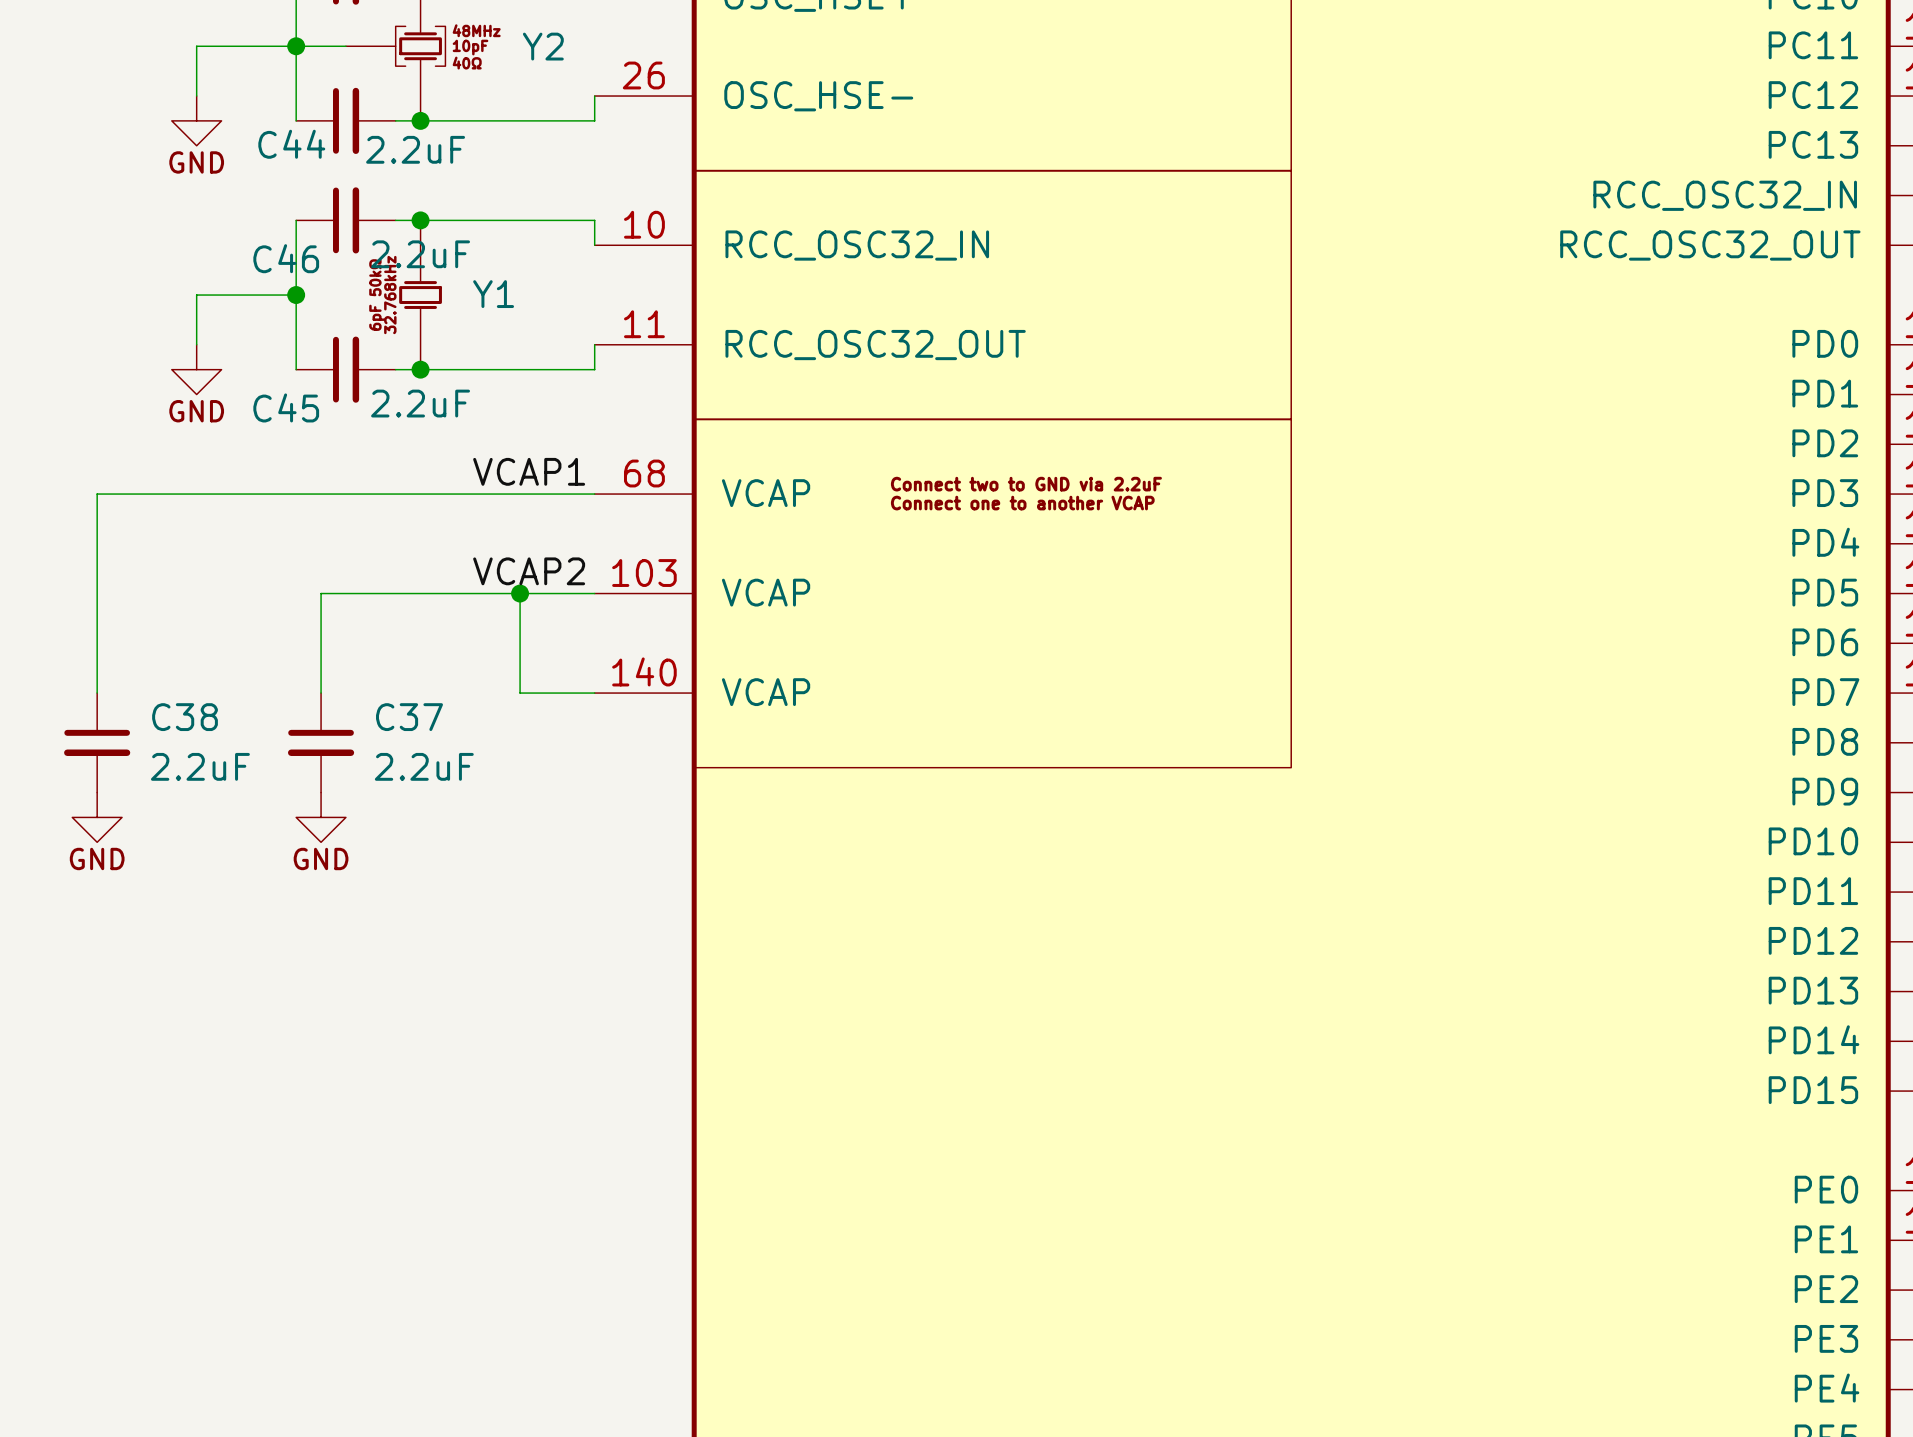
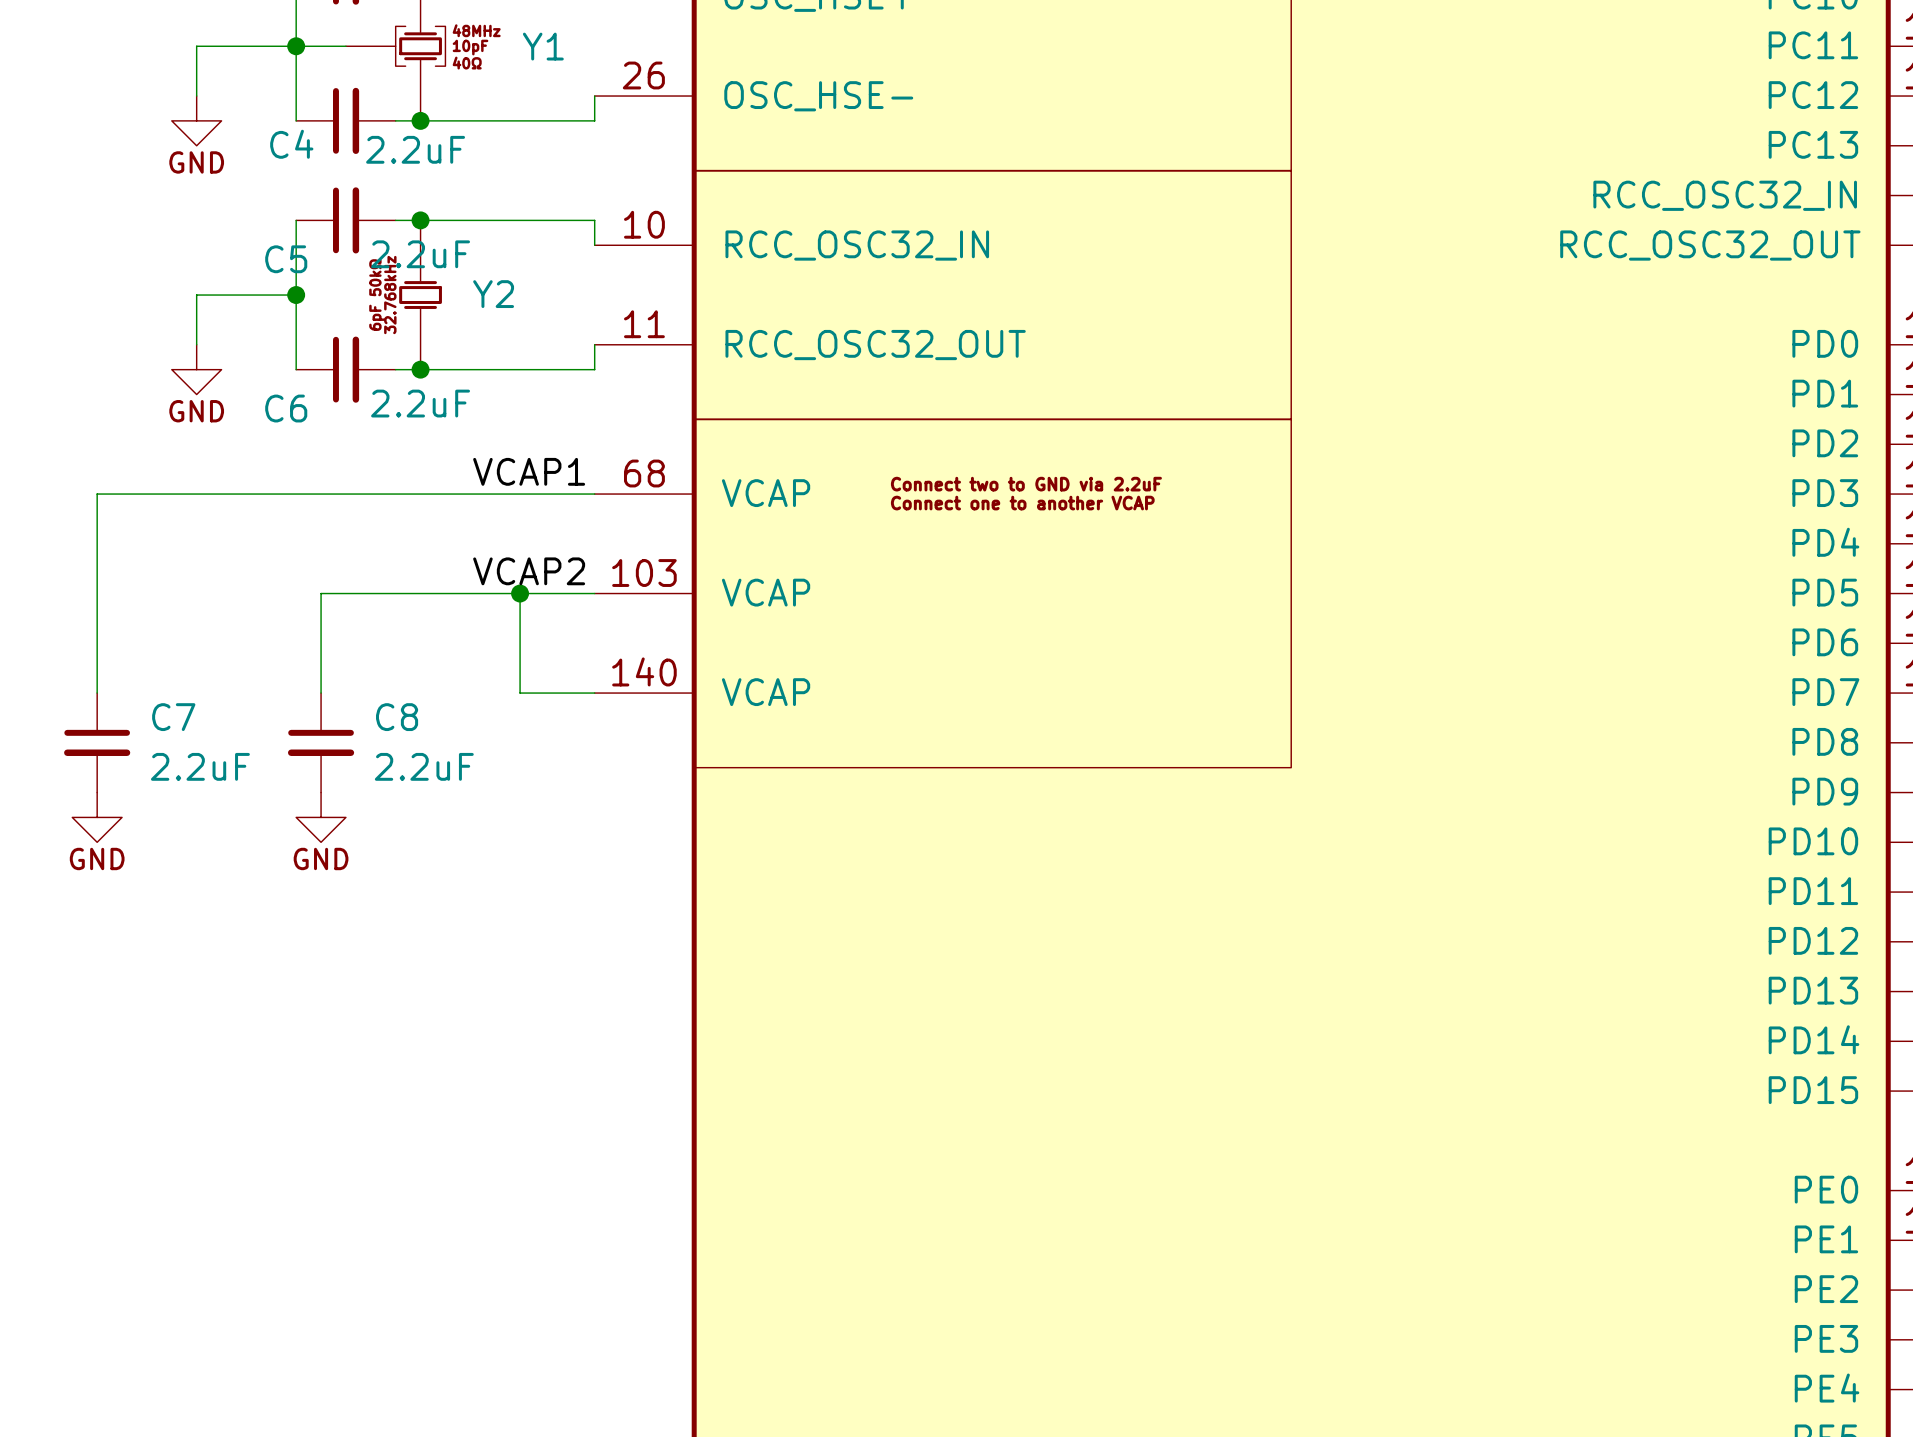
Y2 name: Y2 (543, 46) -> Y1 (543, 46)
C44 name: C44 (291, 144) -> C4 (291, 144)
C46 name: C46 (286, 258) -> C5 (286, 259)
Y1 name: Y1 (493, 294) -> Y2 (493, 294)
C45 name: C45 (286, 407) -> C6 (286, 408)
C38 name: C38 (185, 717) -> C7 (173, 717)
C37 name: C37 (409, 717) -> C8 (397, 717)

